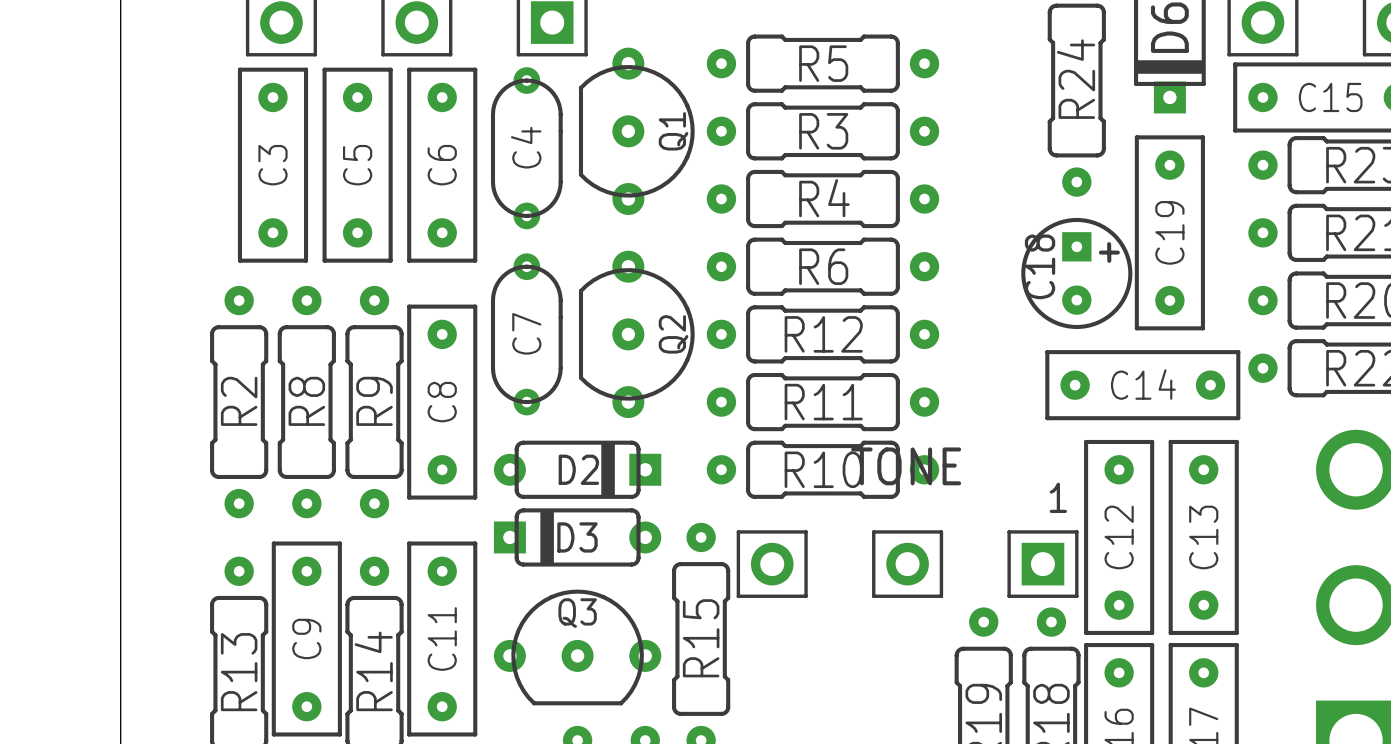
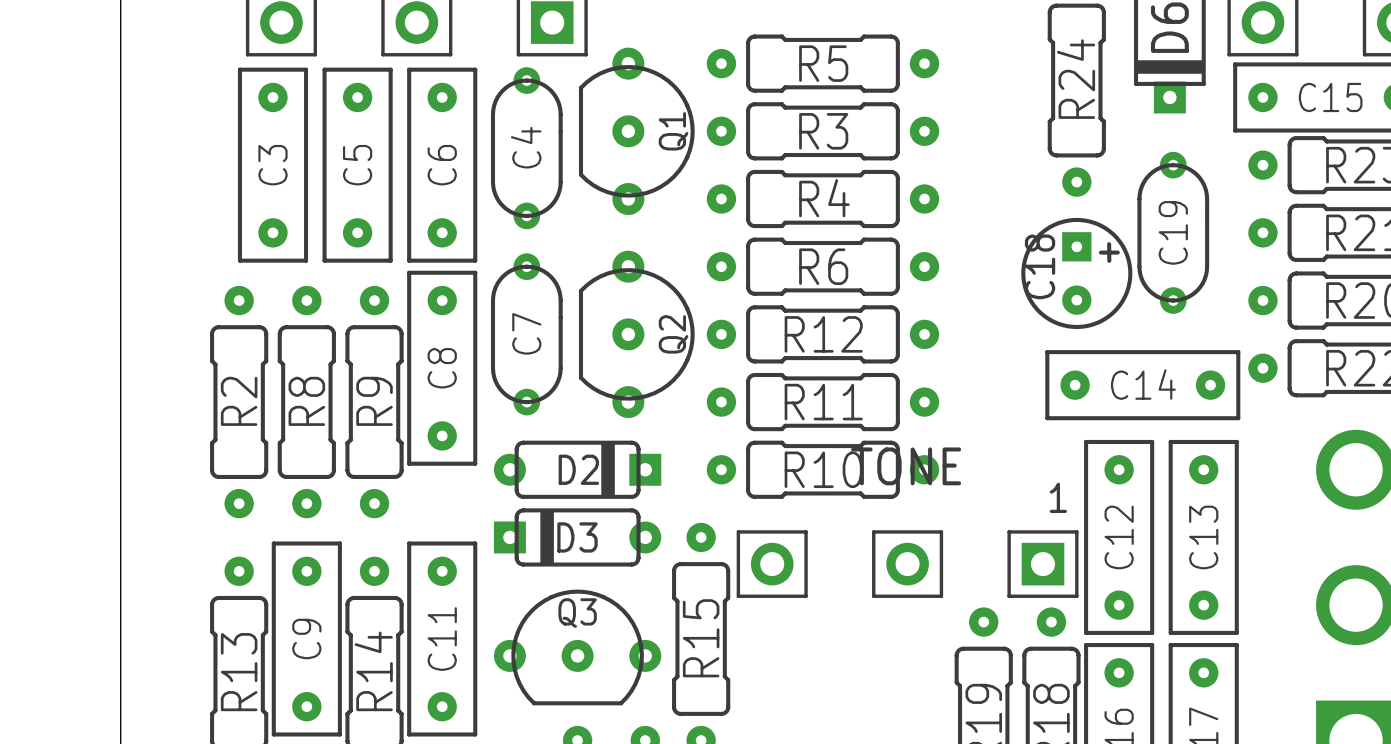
C19 footprint: [1134, 135, 1205, 331] -> [1137, 151, 1210, 314]
C8 position: (442, 402) -> (442, 368)

